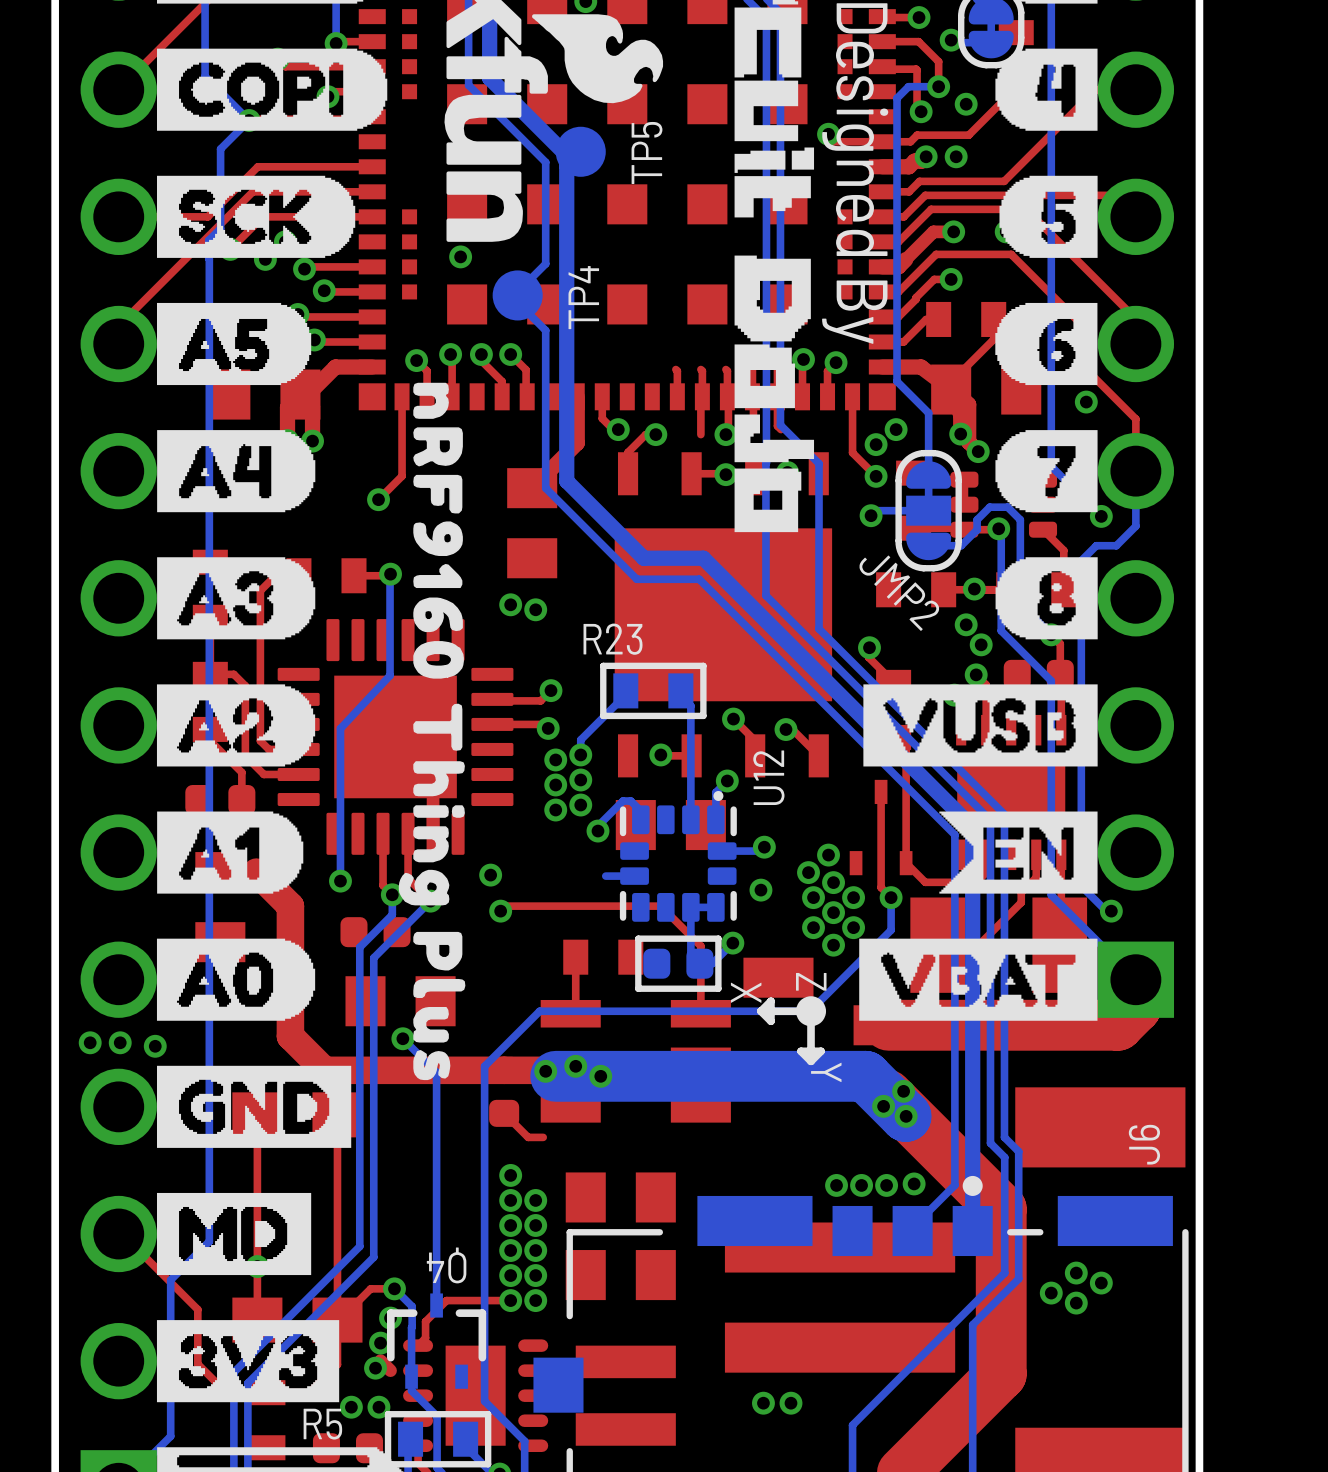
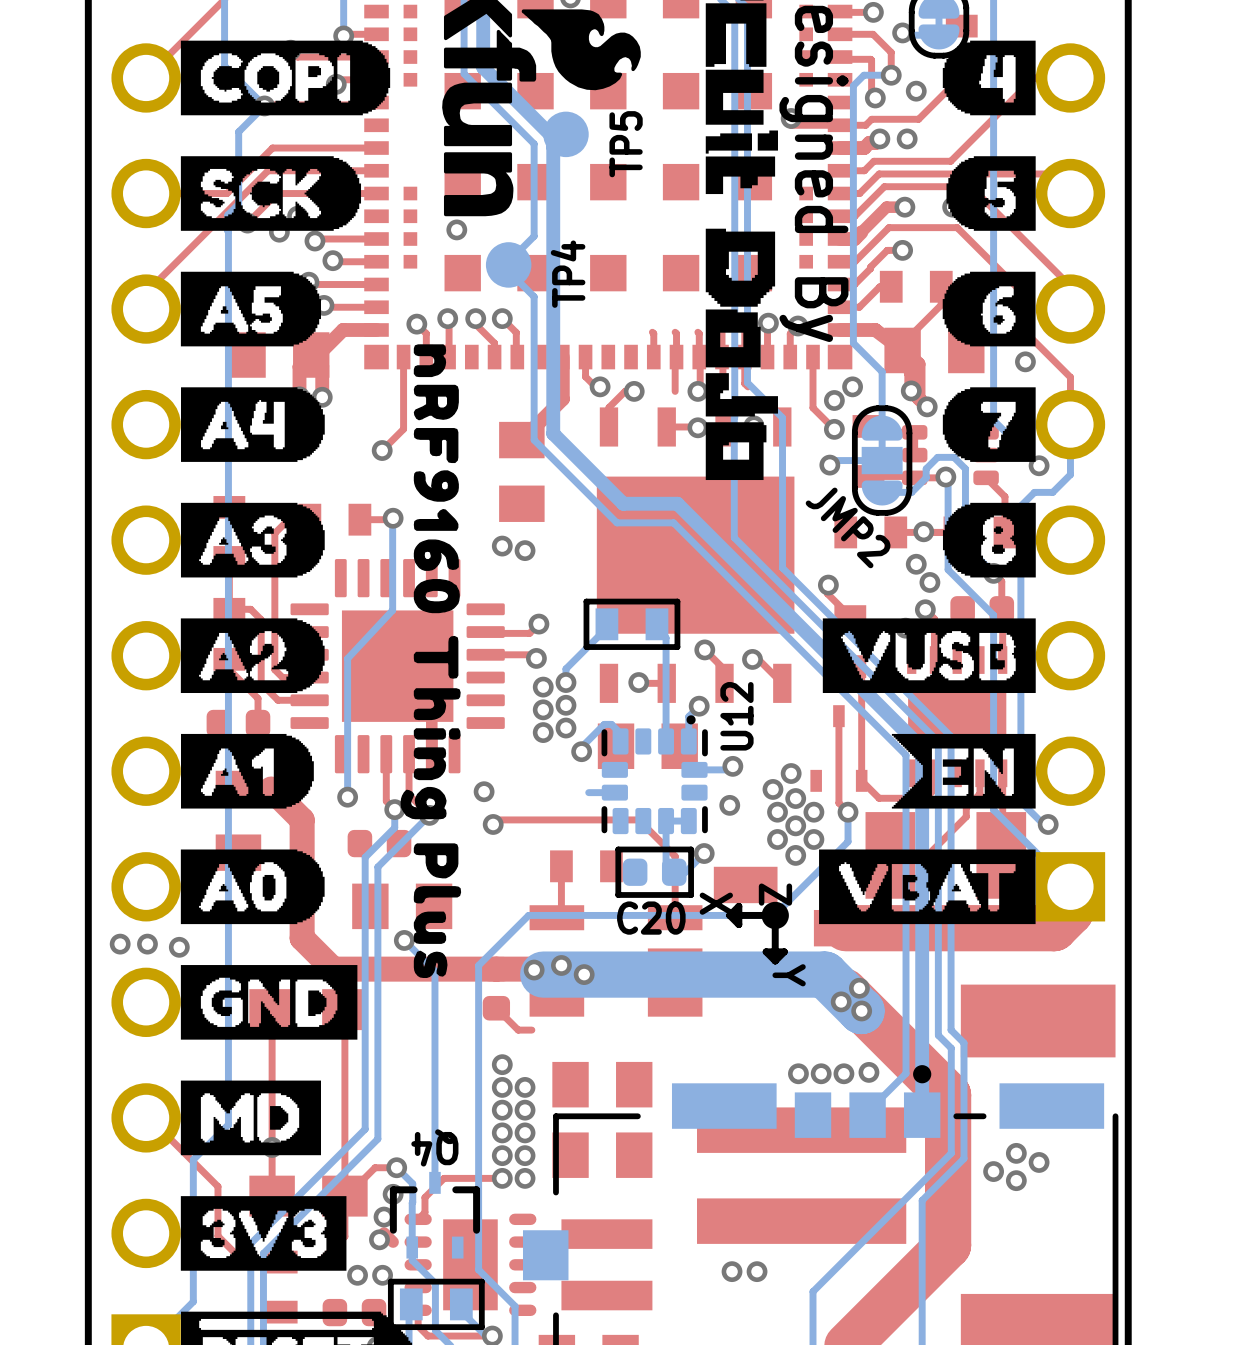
R23 name: R23 (613, 639) -> none
C20 name: none -> C20 (651, 918)
J6 name: J6 (1144, 1144) -> none
R5 name: R5 (322, 1424) -> none

